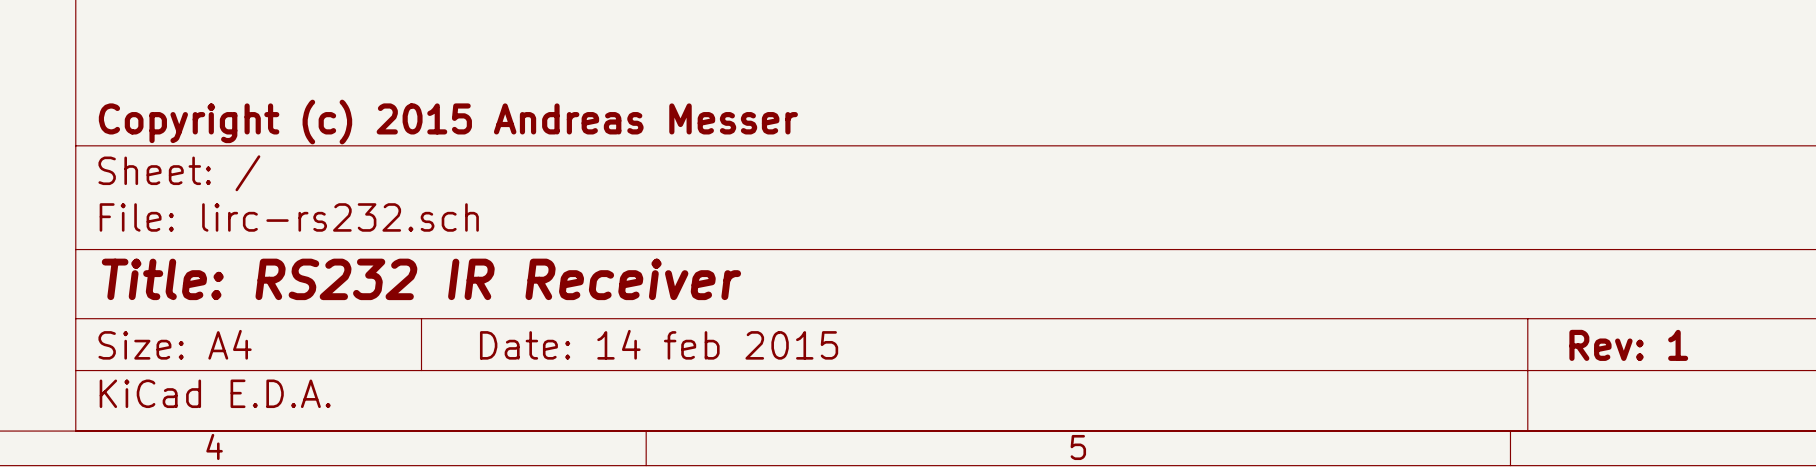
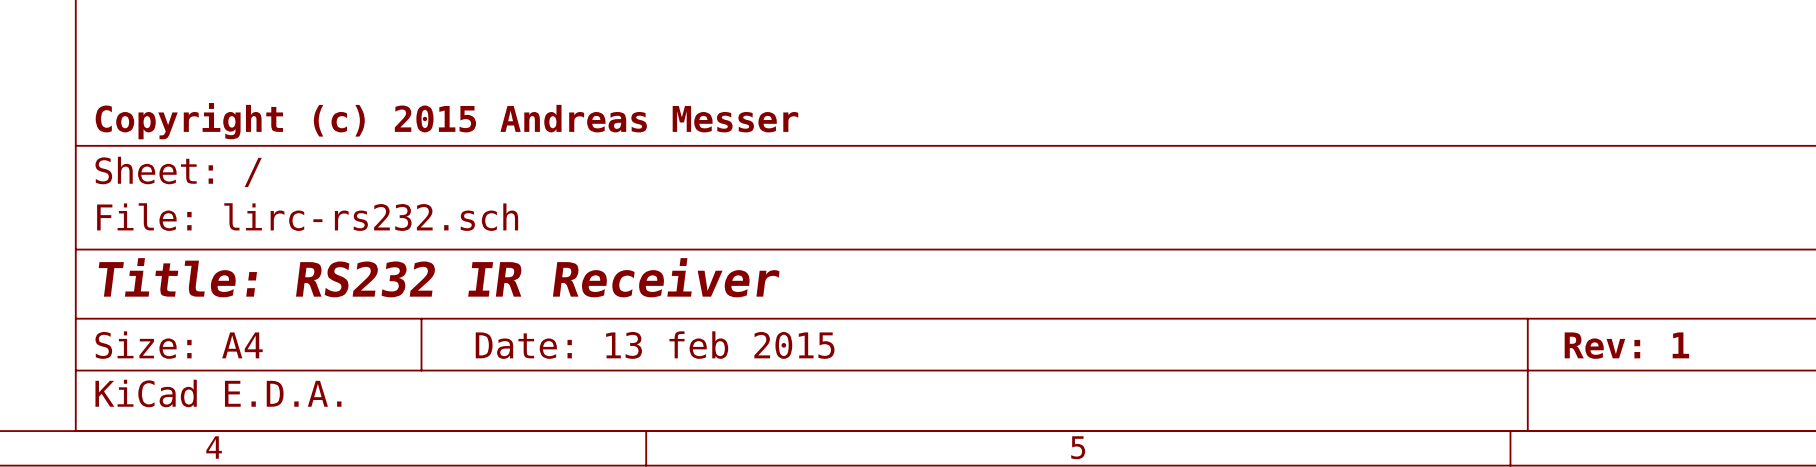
title block: Date: 14 feb 2015 (659, 344) -> Date: 13 feb 2015 (655, 345)

